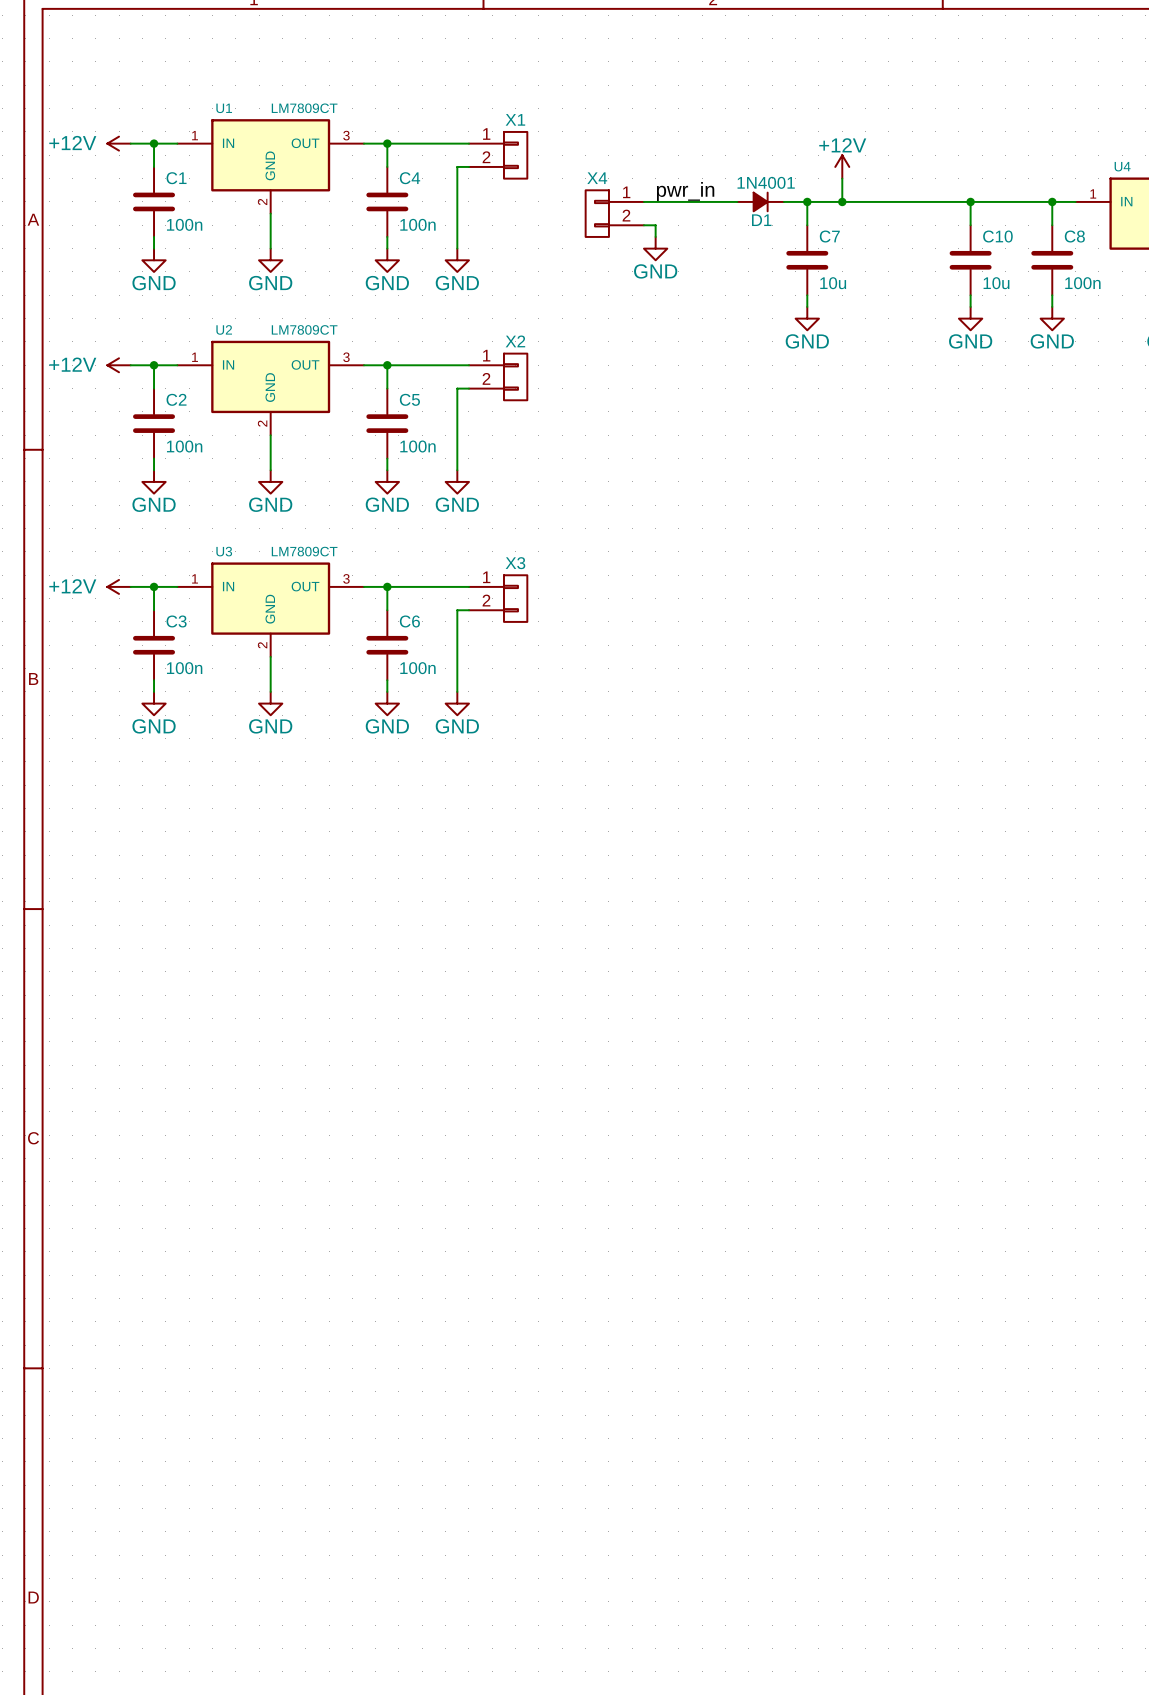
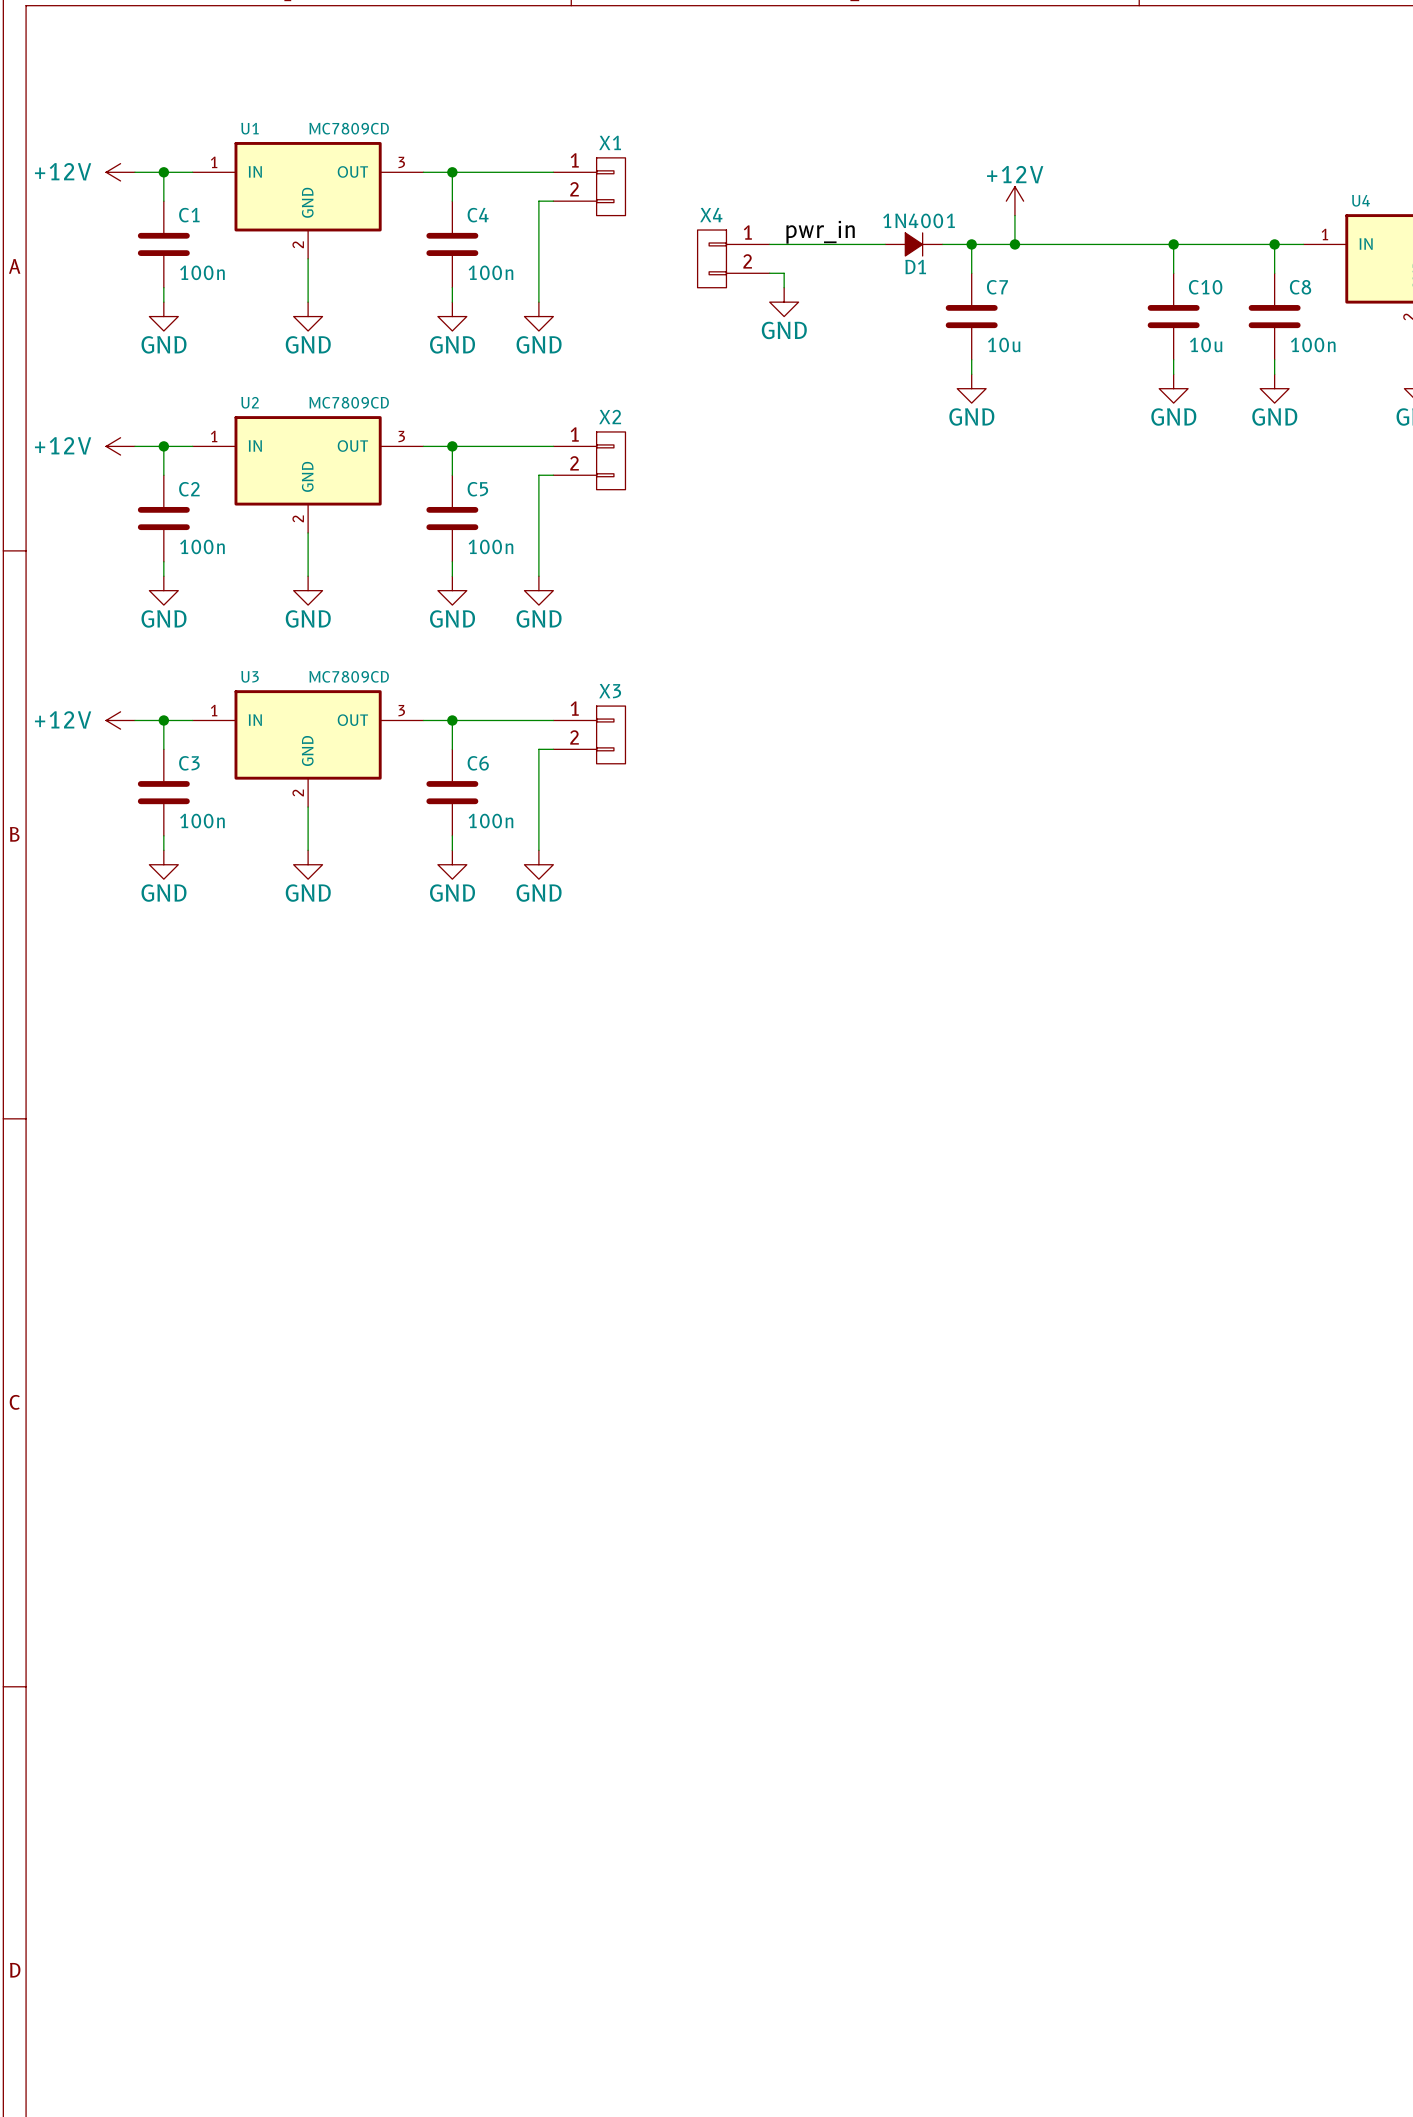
U1 value: LM7809CT (304, 108) -> MC7809CD (349, 128)
U2 value: LM7809CT (304, 329) -> MC7809CD (349, 402)
U3 value: LM7809CT (304, 551) -> MC7809CD (349, 676)

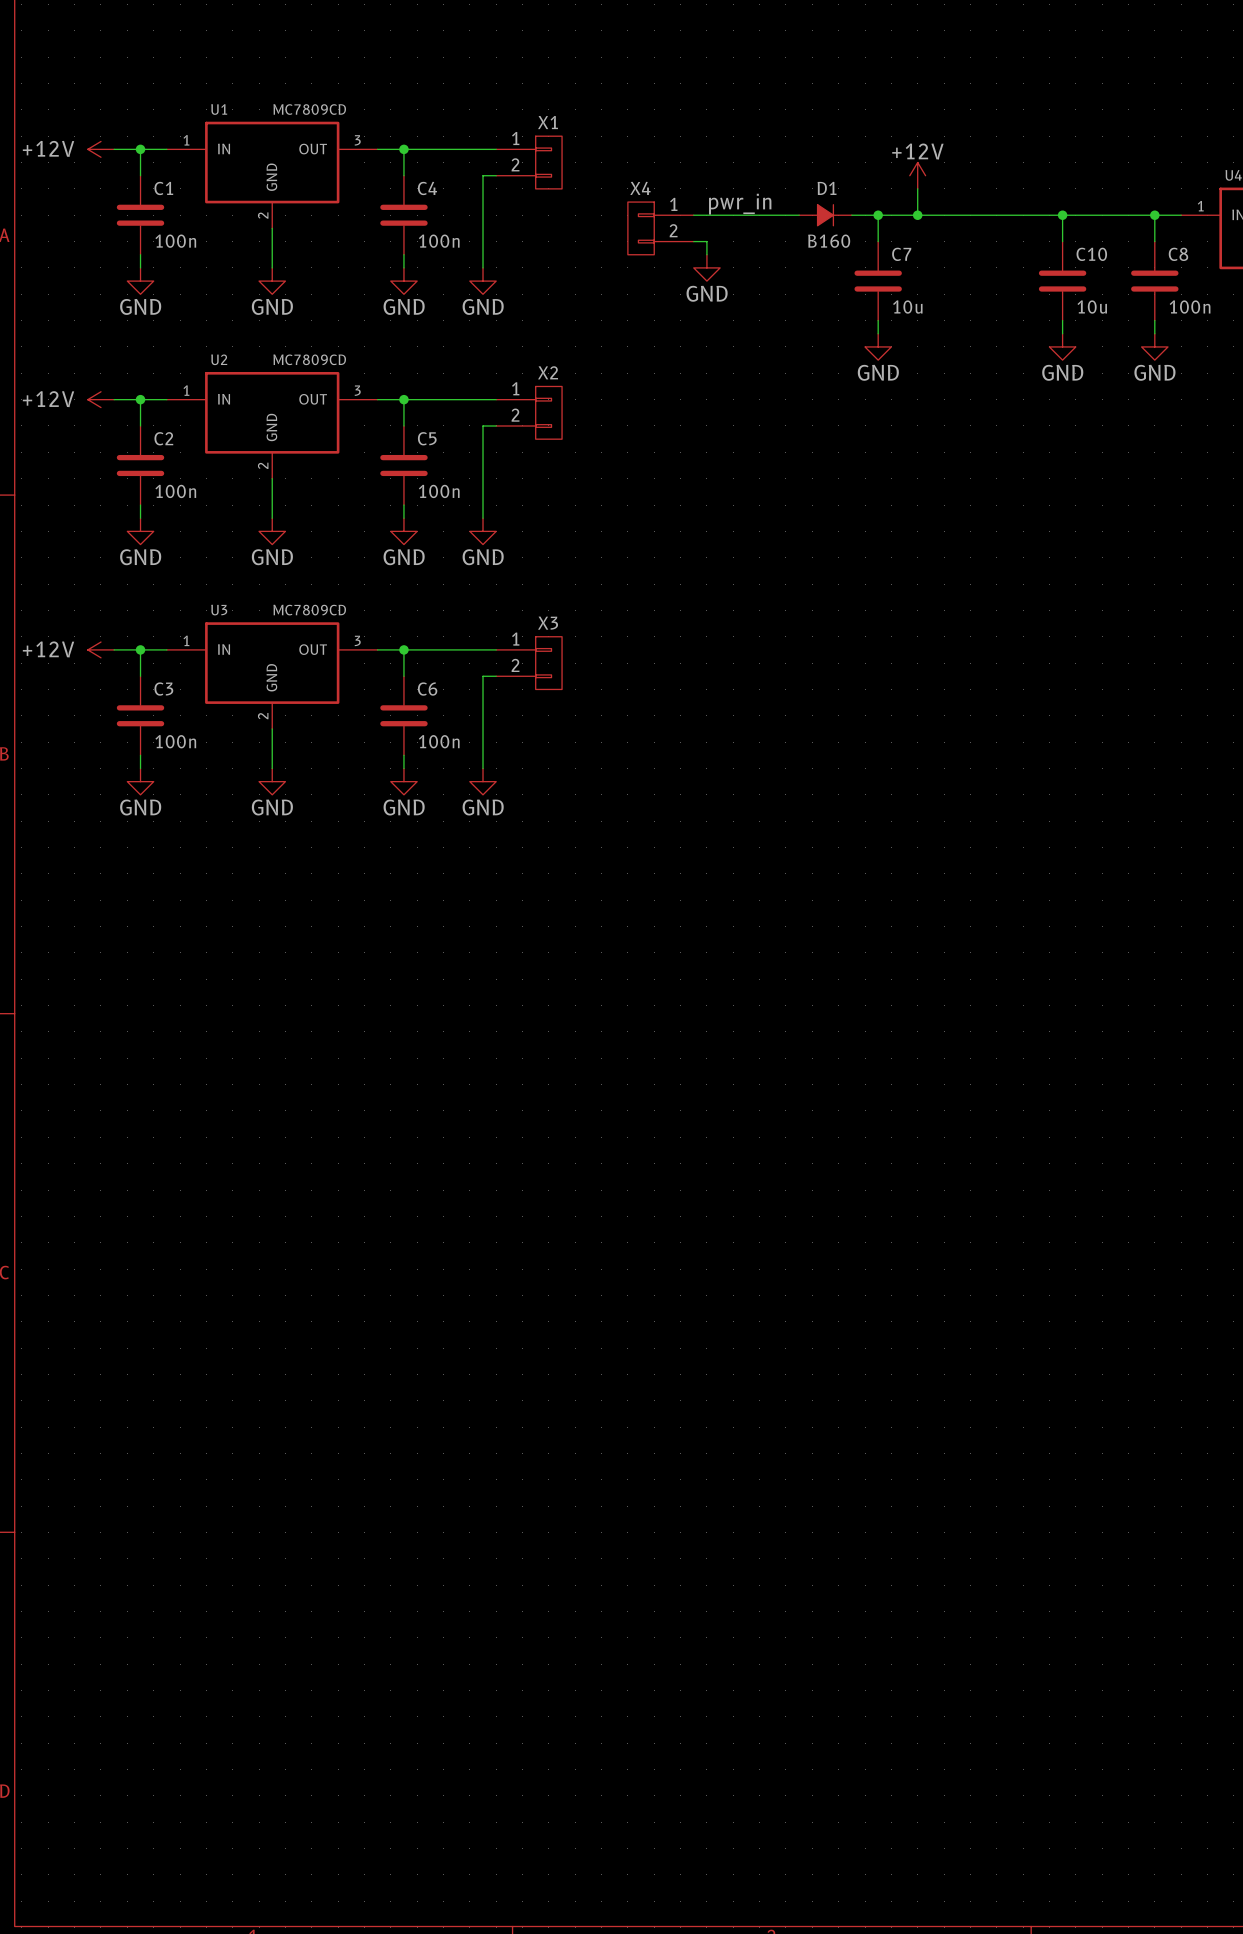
D1 value: 1N4001 (919, 220) -> B160 (829, 241)
D1 name position: D1 (915, 266) -> D1 (827, 188)

